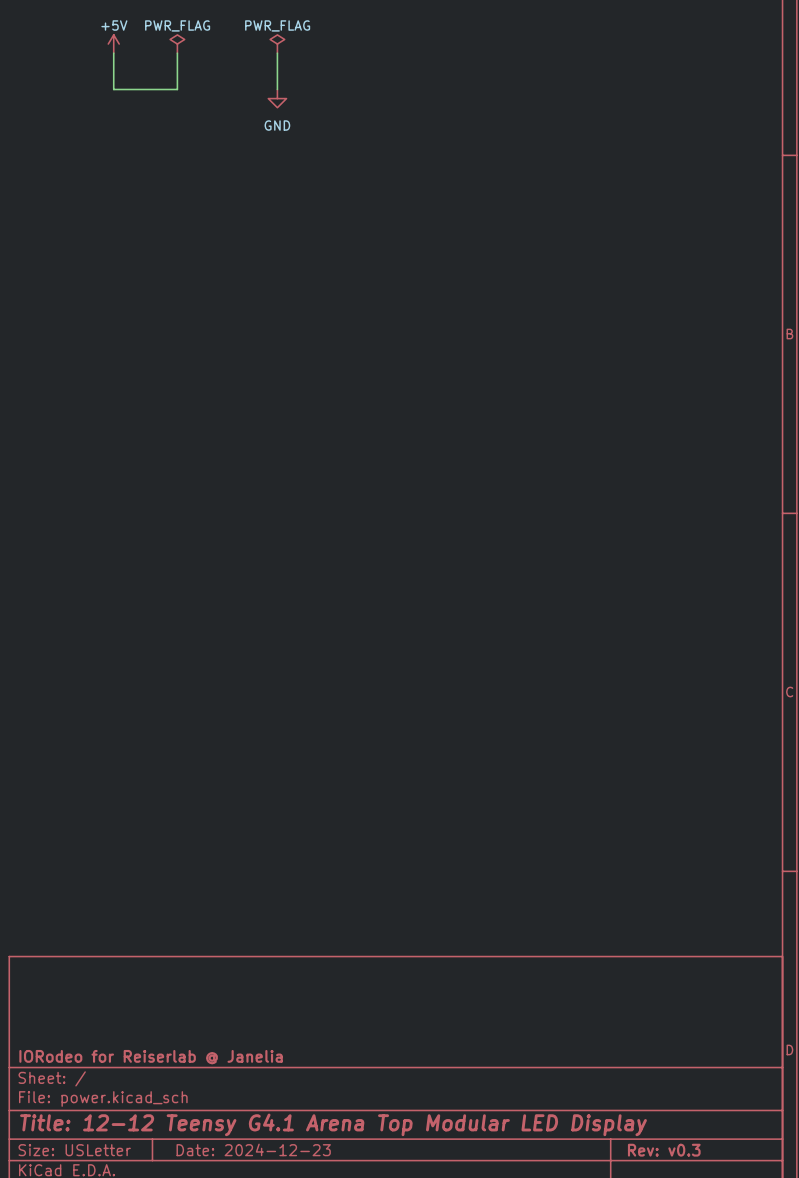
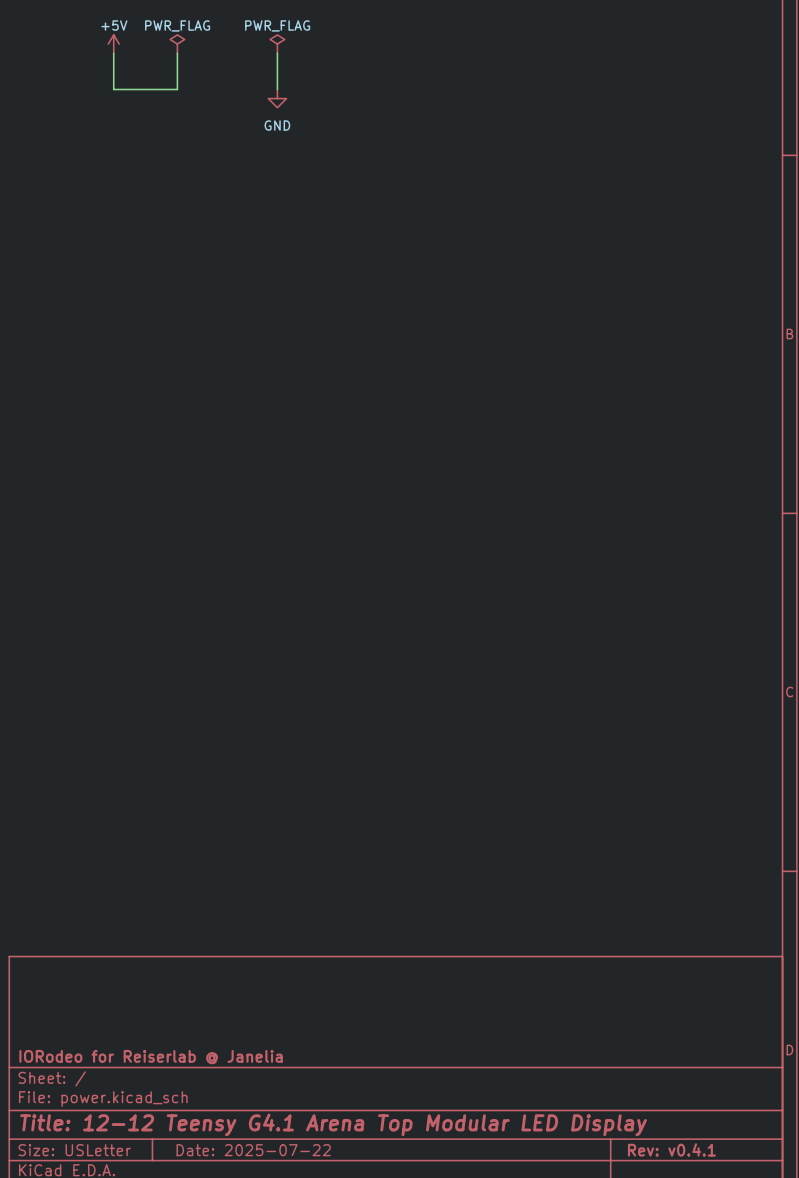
title block: Date: 2024-12-23 (253, 1149) -> Date: 2025-07-22 (253, 1150)
title block: Rev: v0.3 (664, 1150) -> Rev: v0.4.1 (671, 1149)

